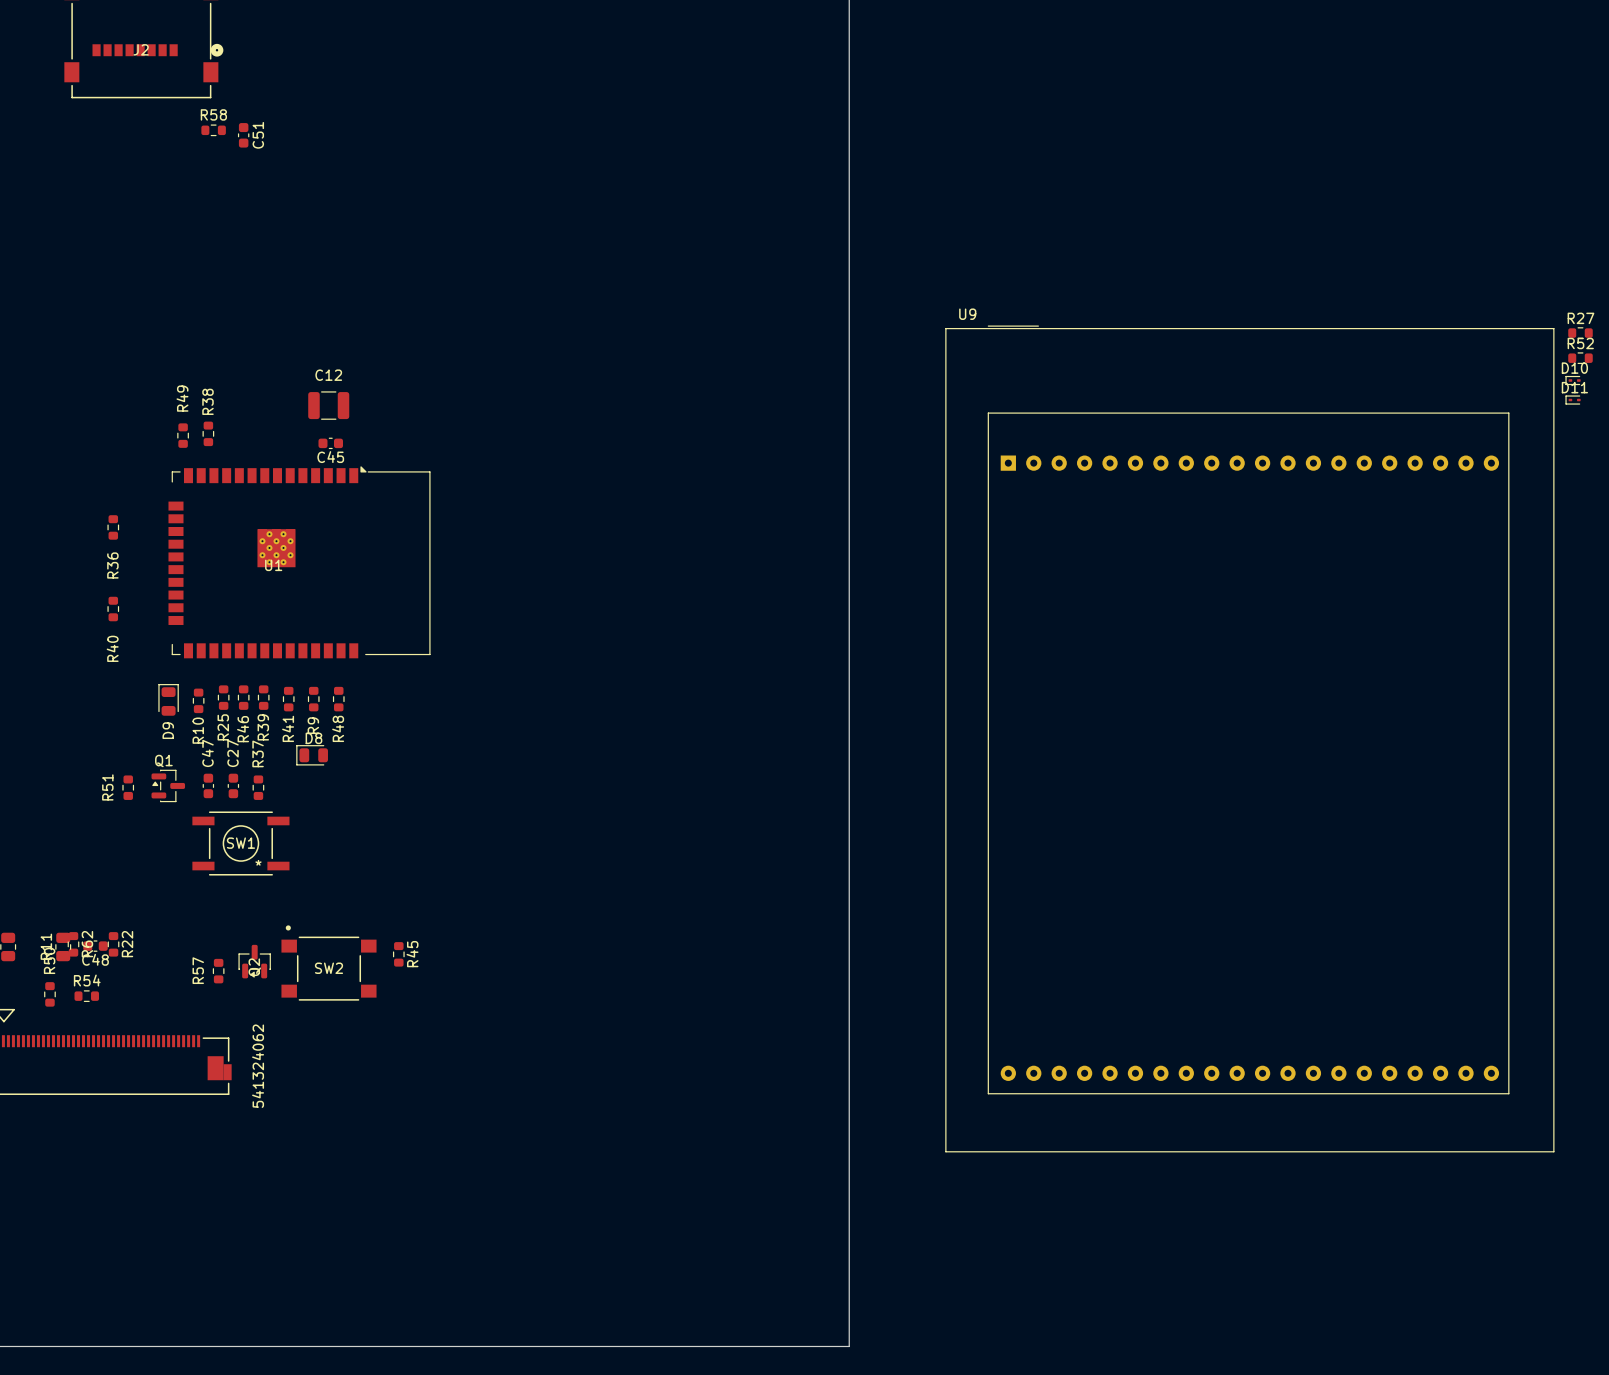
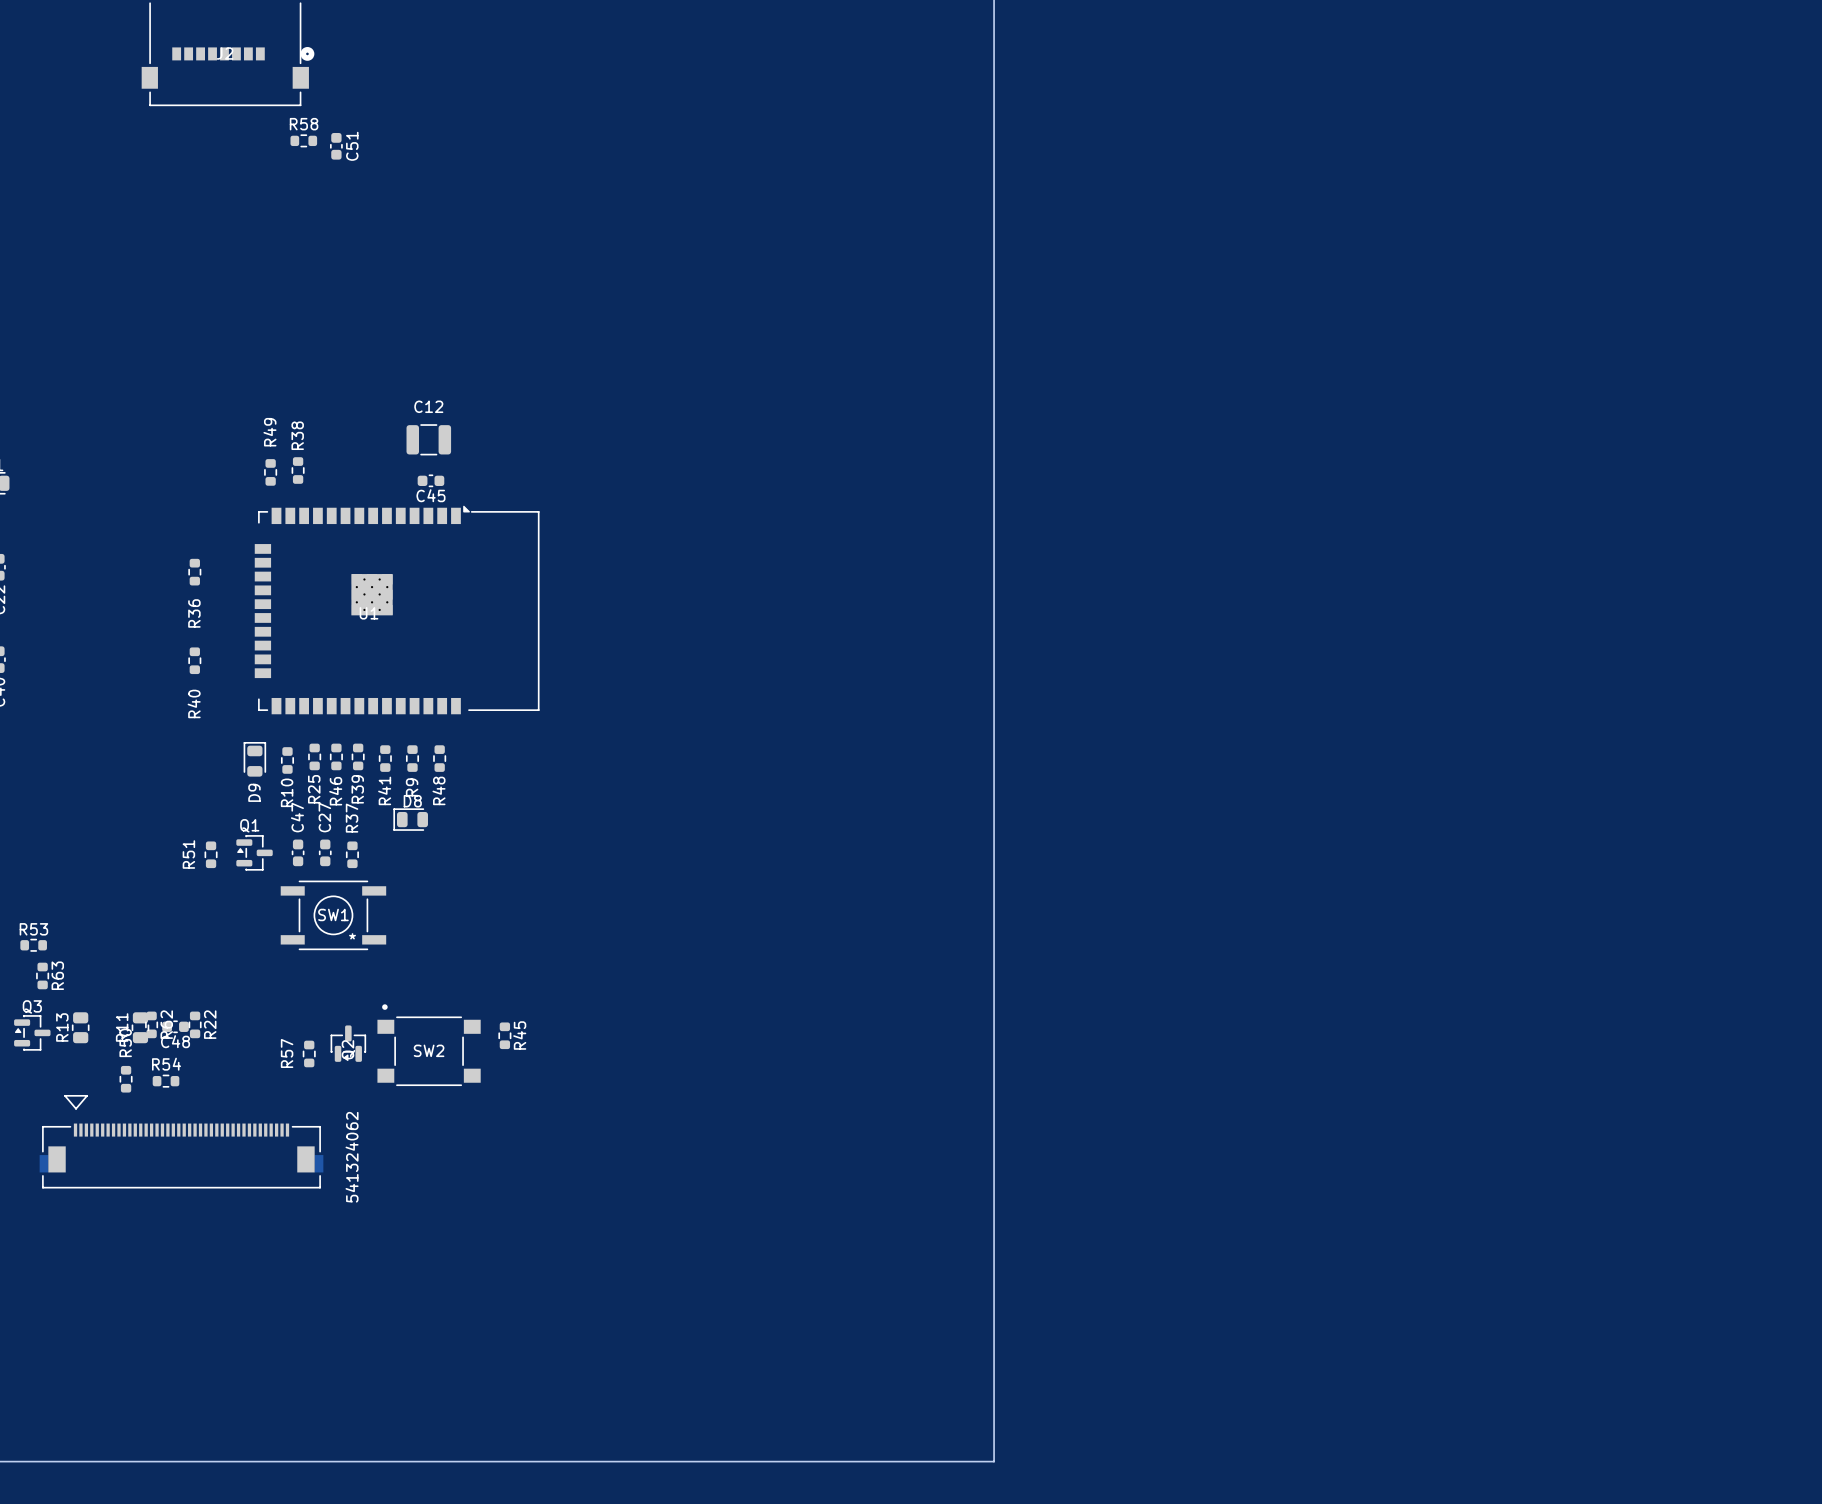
R27: (1580, 333) -> none
R52: (1580, 358) -> none
D10: (1573, 380) -> none
D11: (1573, 400) -> none
U9: (1249, 738) -> none

